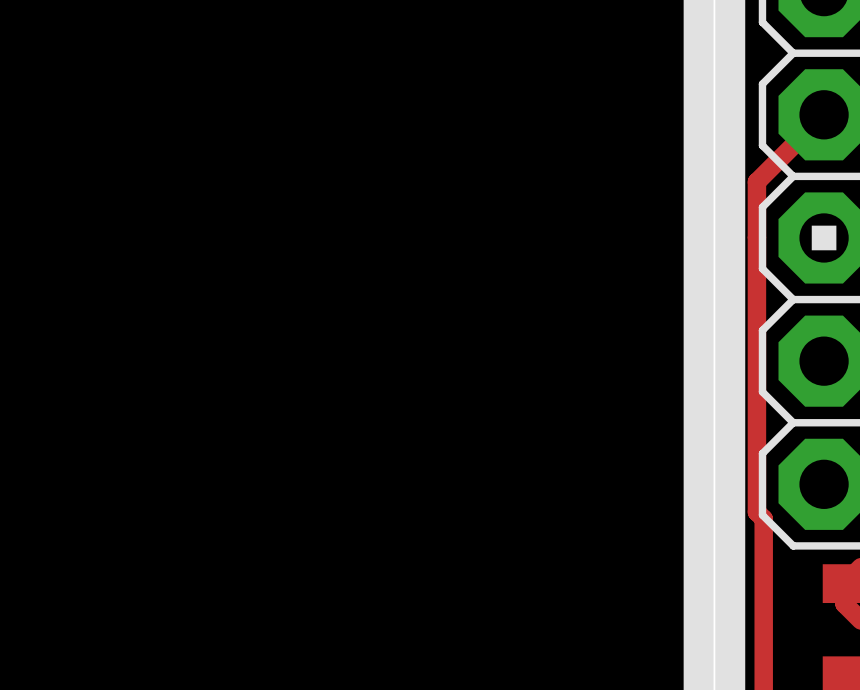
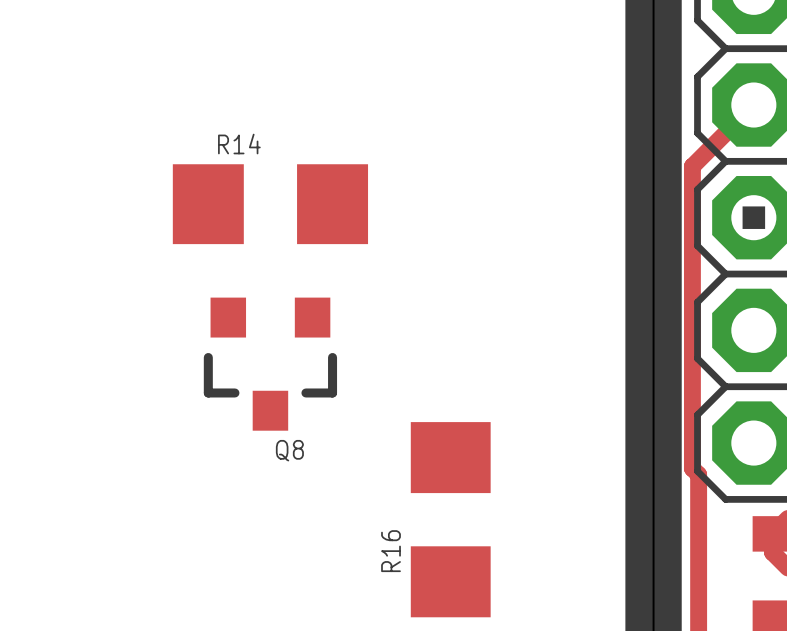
R14: none -> (270, 204)
Q8: none -> (270, 364)
R16: none -> (450, 519)

